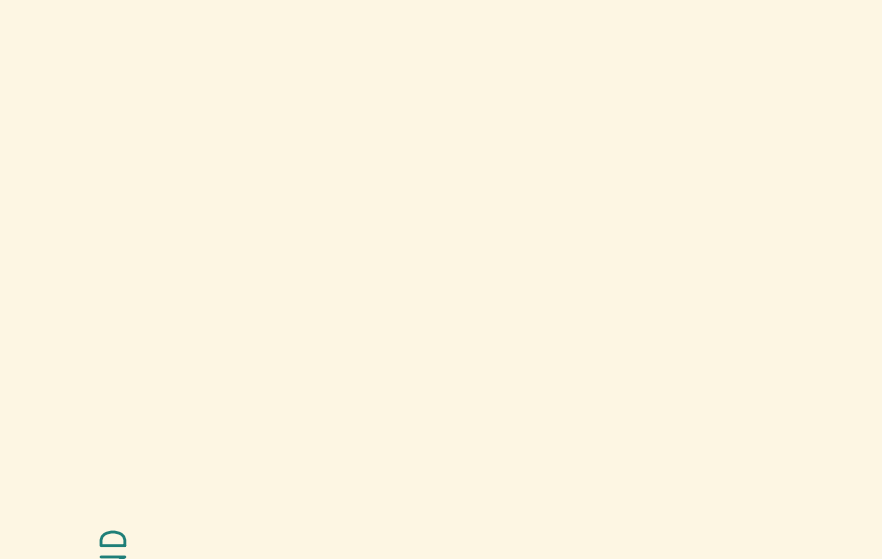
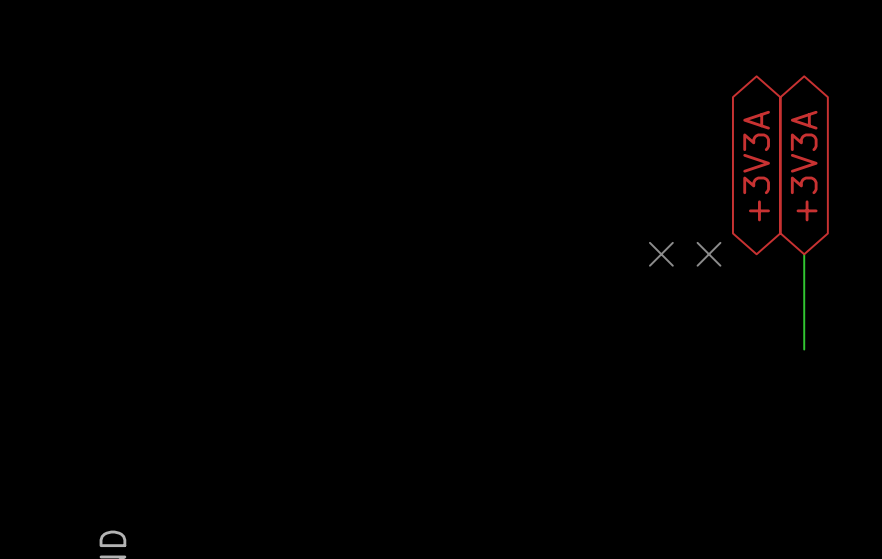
global label: none -> +3V3A (756, 166)
global label: none -> +3V3A (804, 166)
no-connect mark: none -> (661, 254)
no-connect mark: none -> (708, 254)
wire: none -> (804, 254) (804, 349)

